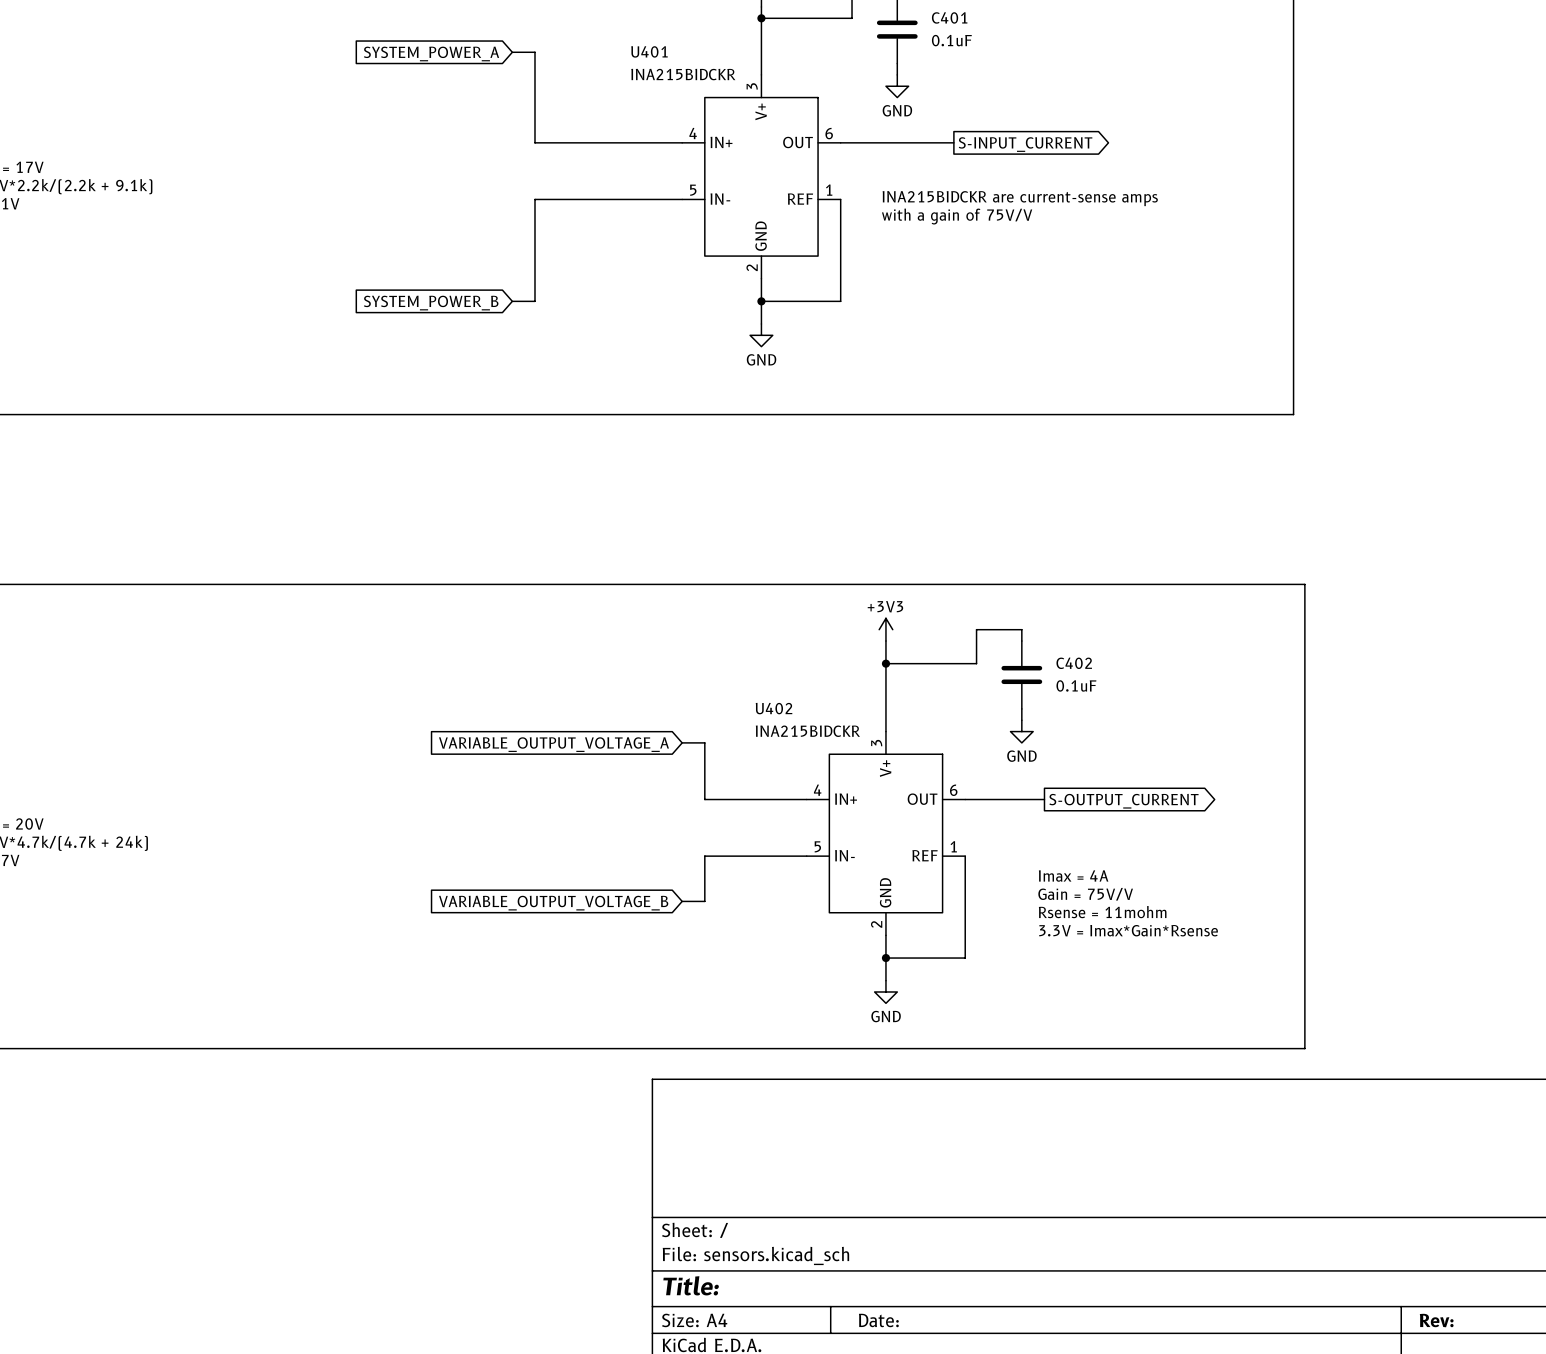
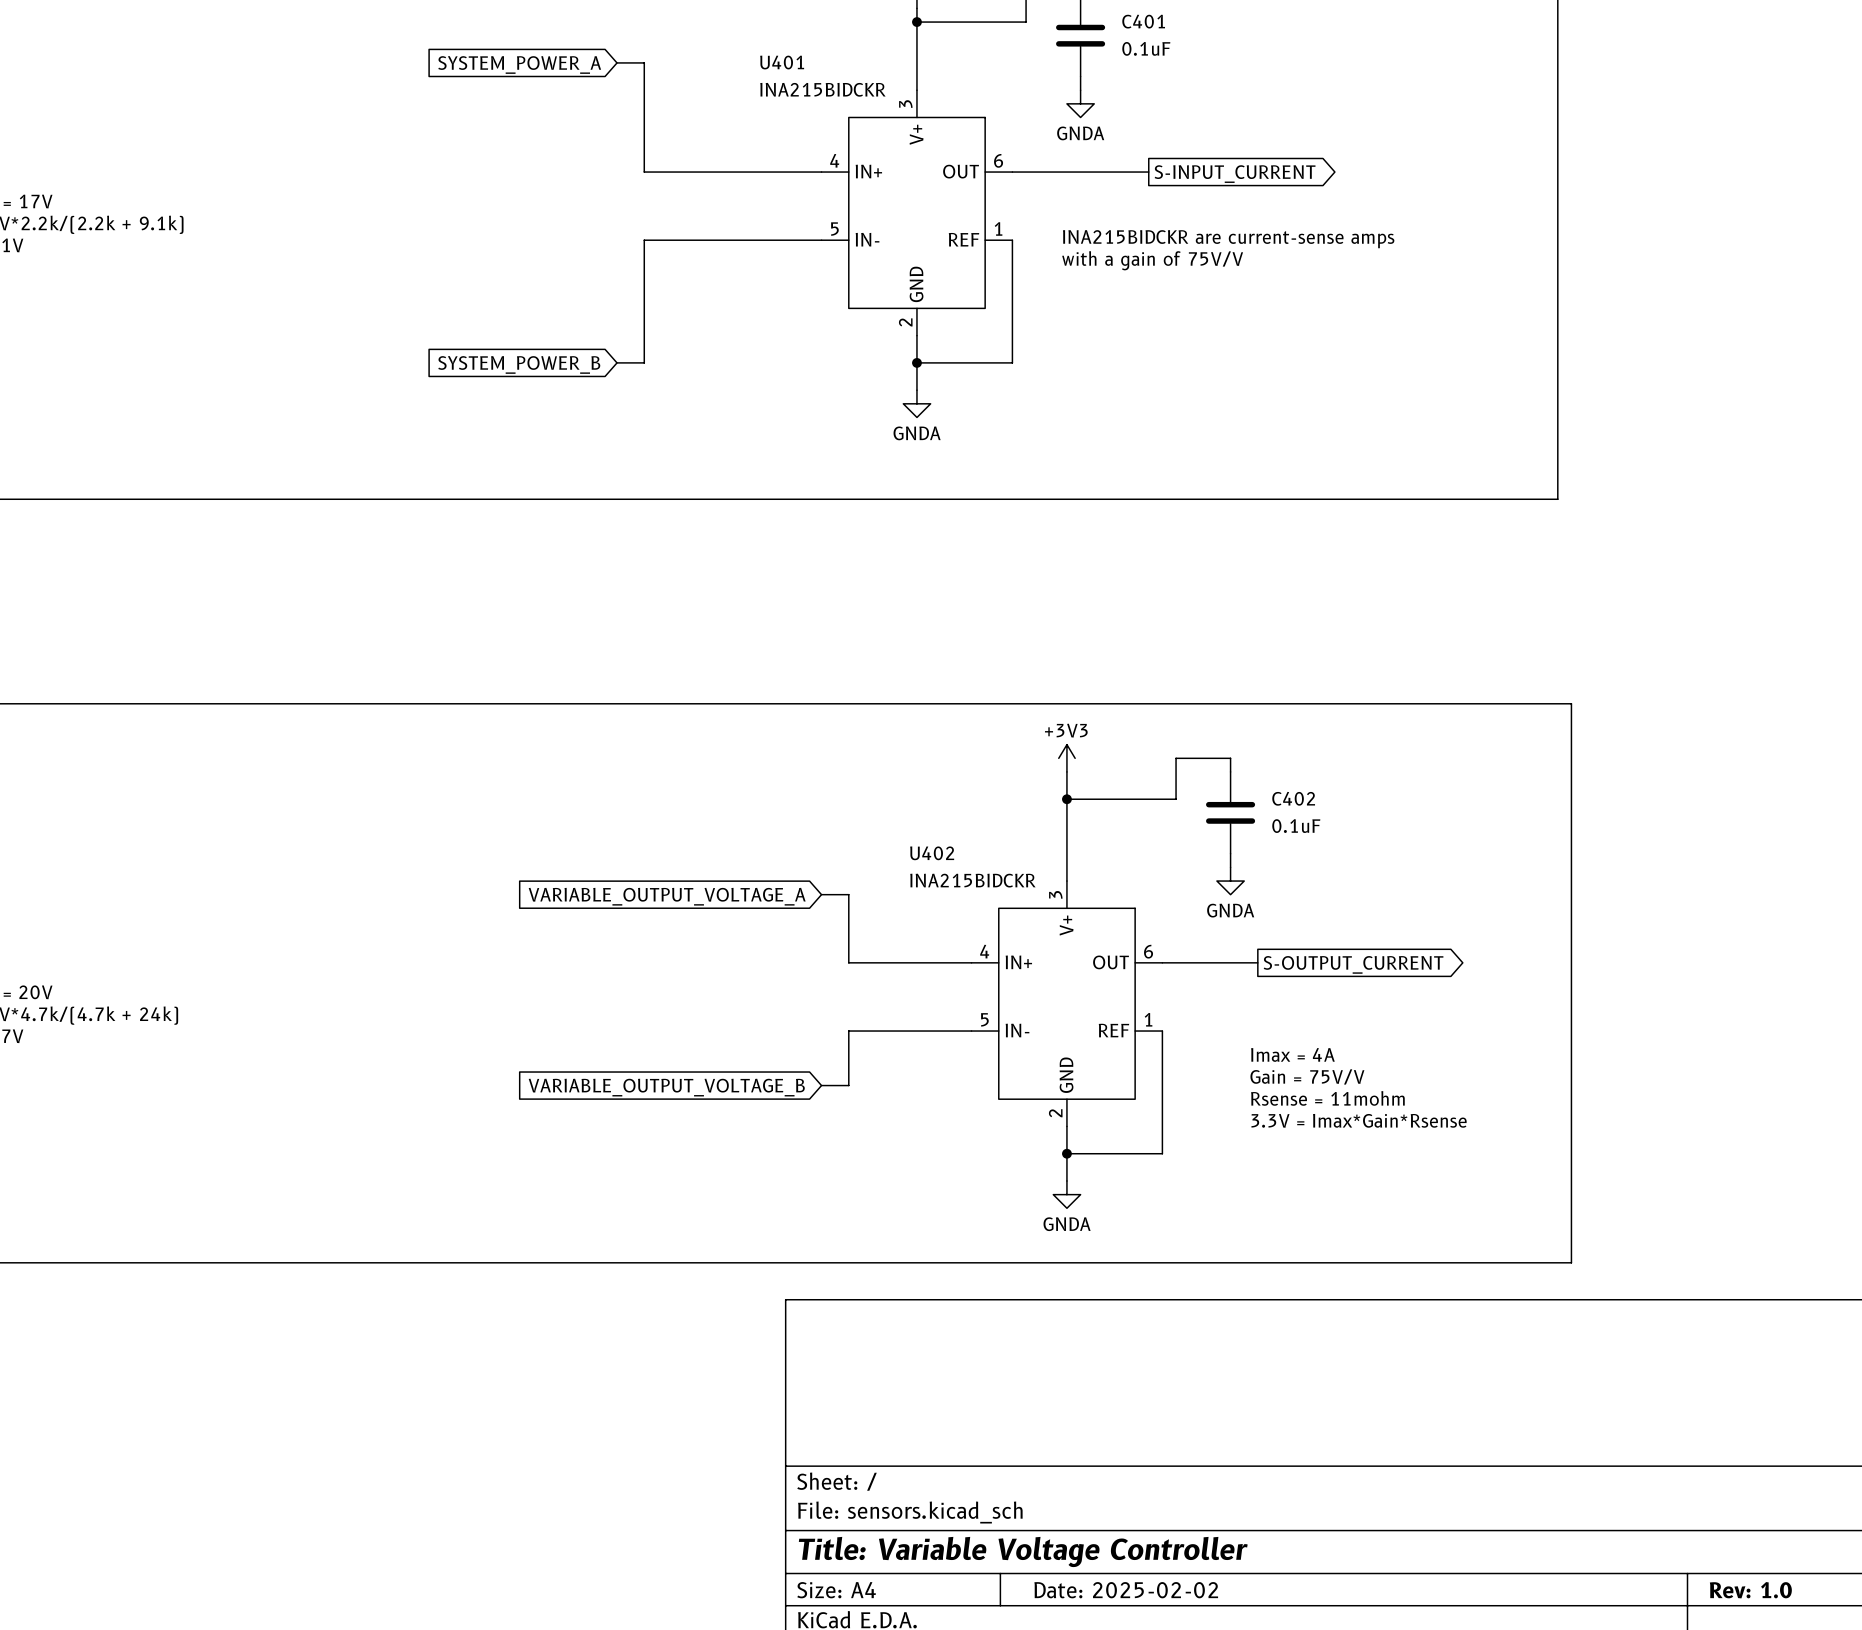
power symbol: GND (897, 86) -> GNDA (1080, 103)
power symbol: GND (761, 335) -> GNDA (916, 403)
power symbol: GND (1021, 731) -> GNDA (1230, 881)
power symbol: GND (885, 991) -> GNDA (1066, 1194)
title block: Title: (691, 1285) -> Title: Variable Voltage Controller (1023, 1551)
title block: Date: (878, 1320) -> Date: 2025-02-02 (1126, 1590)
title block: Rev: (1436, 1320) -> Rev: 1.0 (1750, 1590)

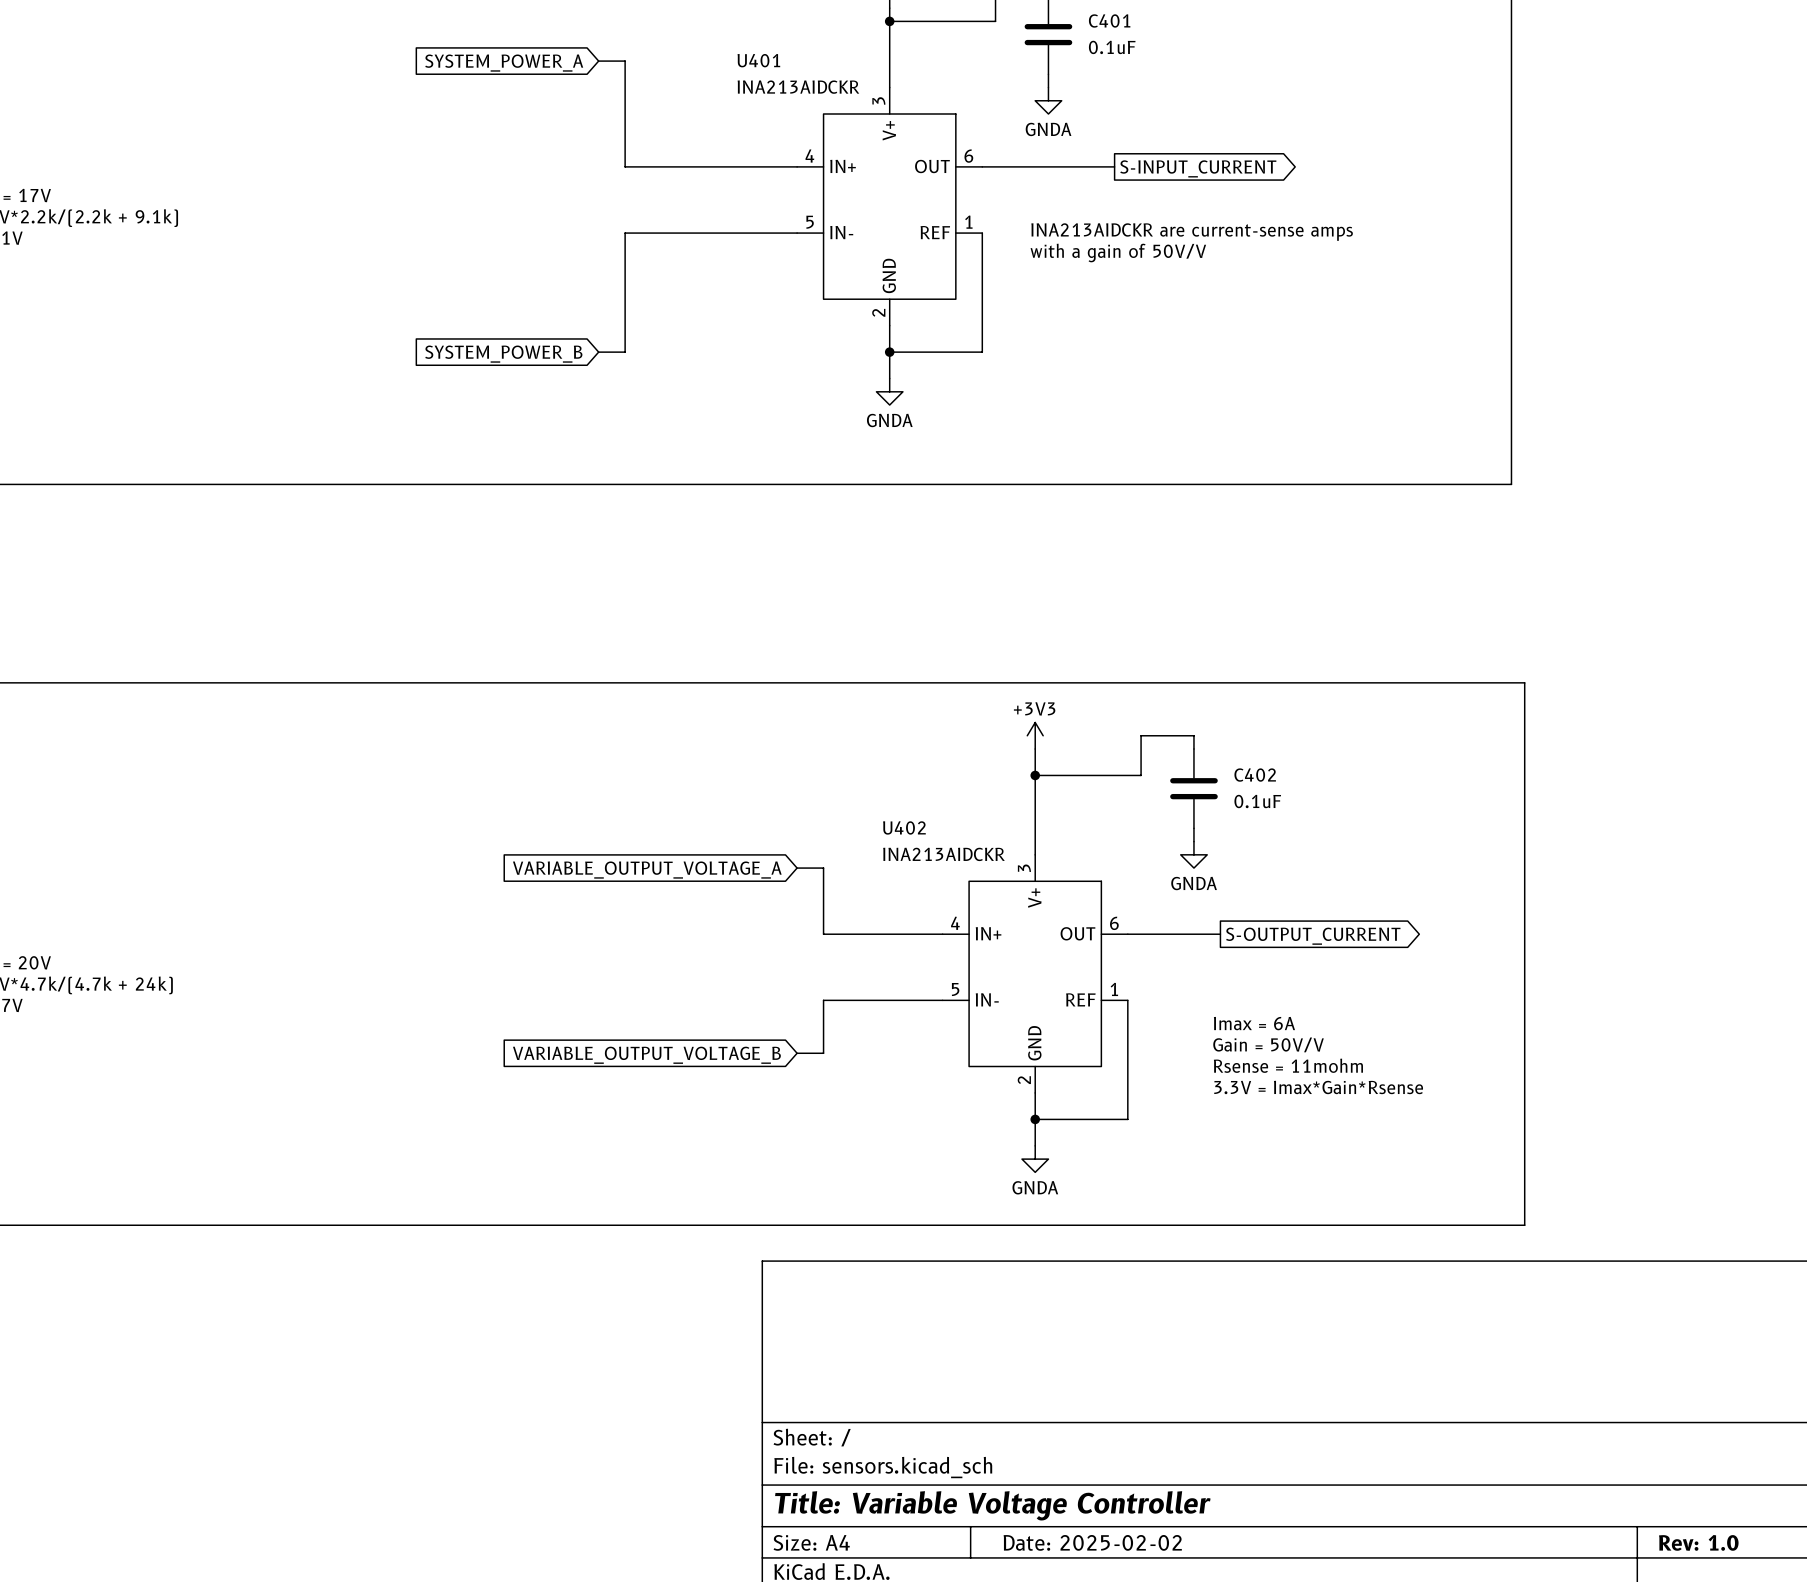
U401 value: INA215BIDCKR (822, 89) -> INA213AIDCKR (798, 87)
text: INA215BIDCKR are current-sense amps (1228, 239) -> INA213AIDCKR are current-sense amps (1192, 232)
text: with a gain of 75V/V (1152, 260) -> with a gain of 50V/V (1118, 253)
U402 value: INA215BIDCKR (972, 880) -> INA213AIDCKR (943, 854)
text: Imax = 4A (1292, 1054) -> Imax = 6A (1254, 1023)
text: Gain = 75V/V (1307, 1076) -> Gain = 50V/V (1268, 1044)

